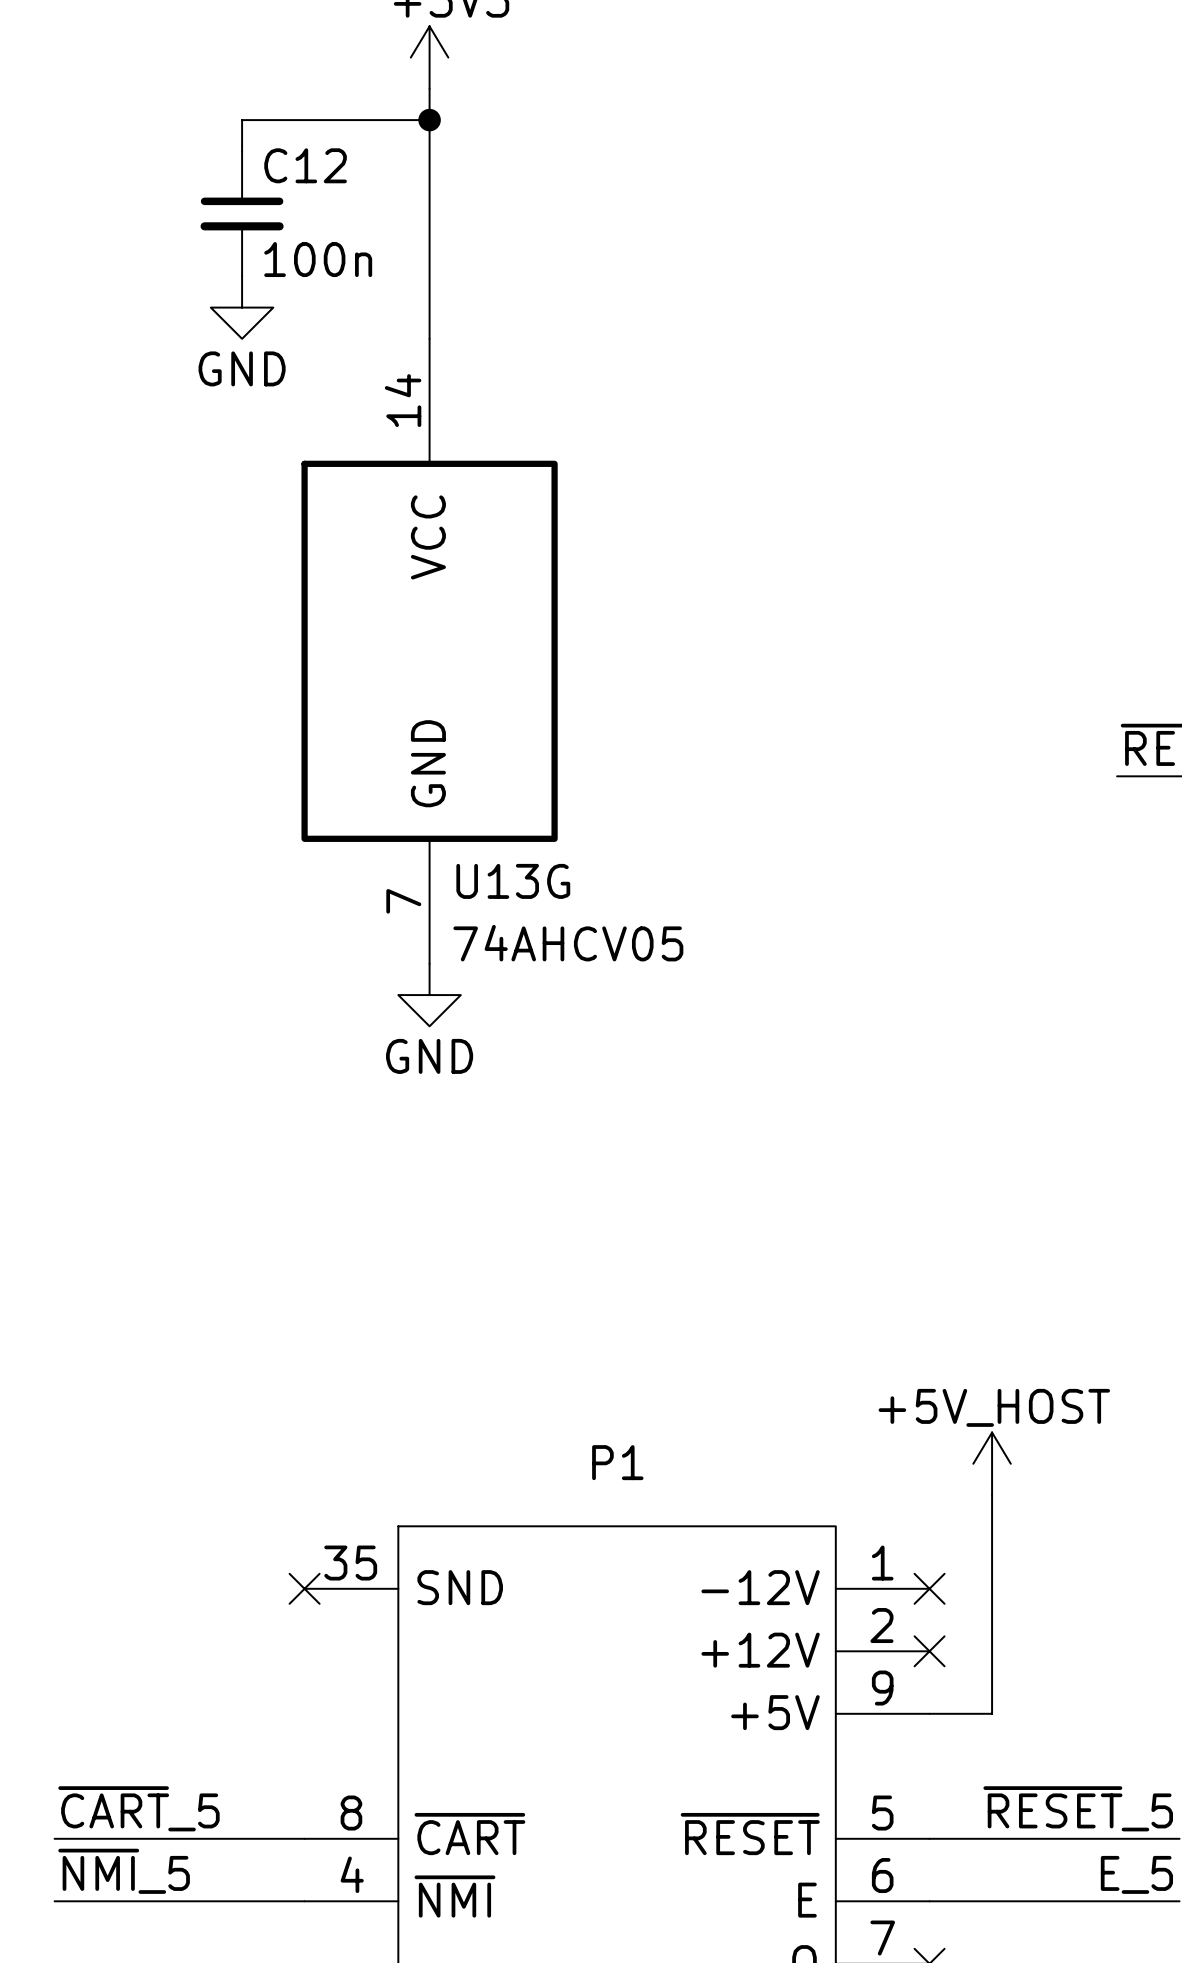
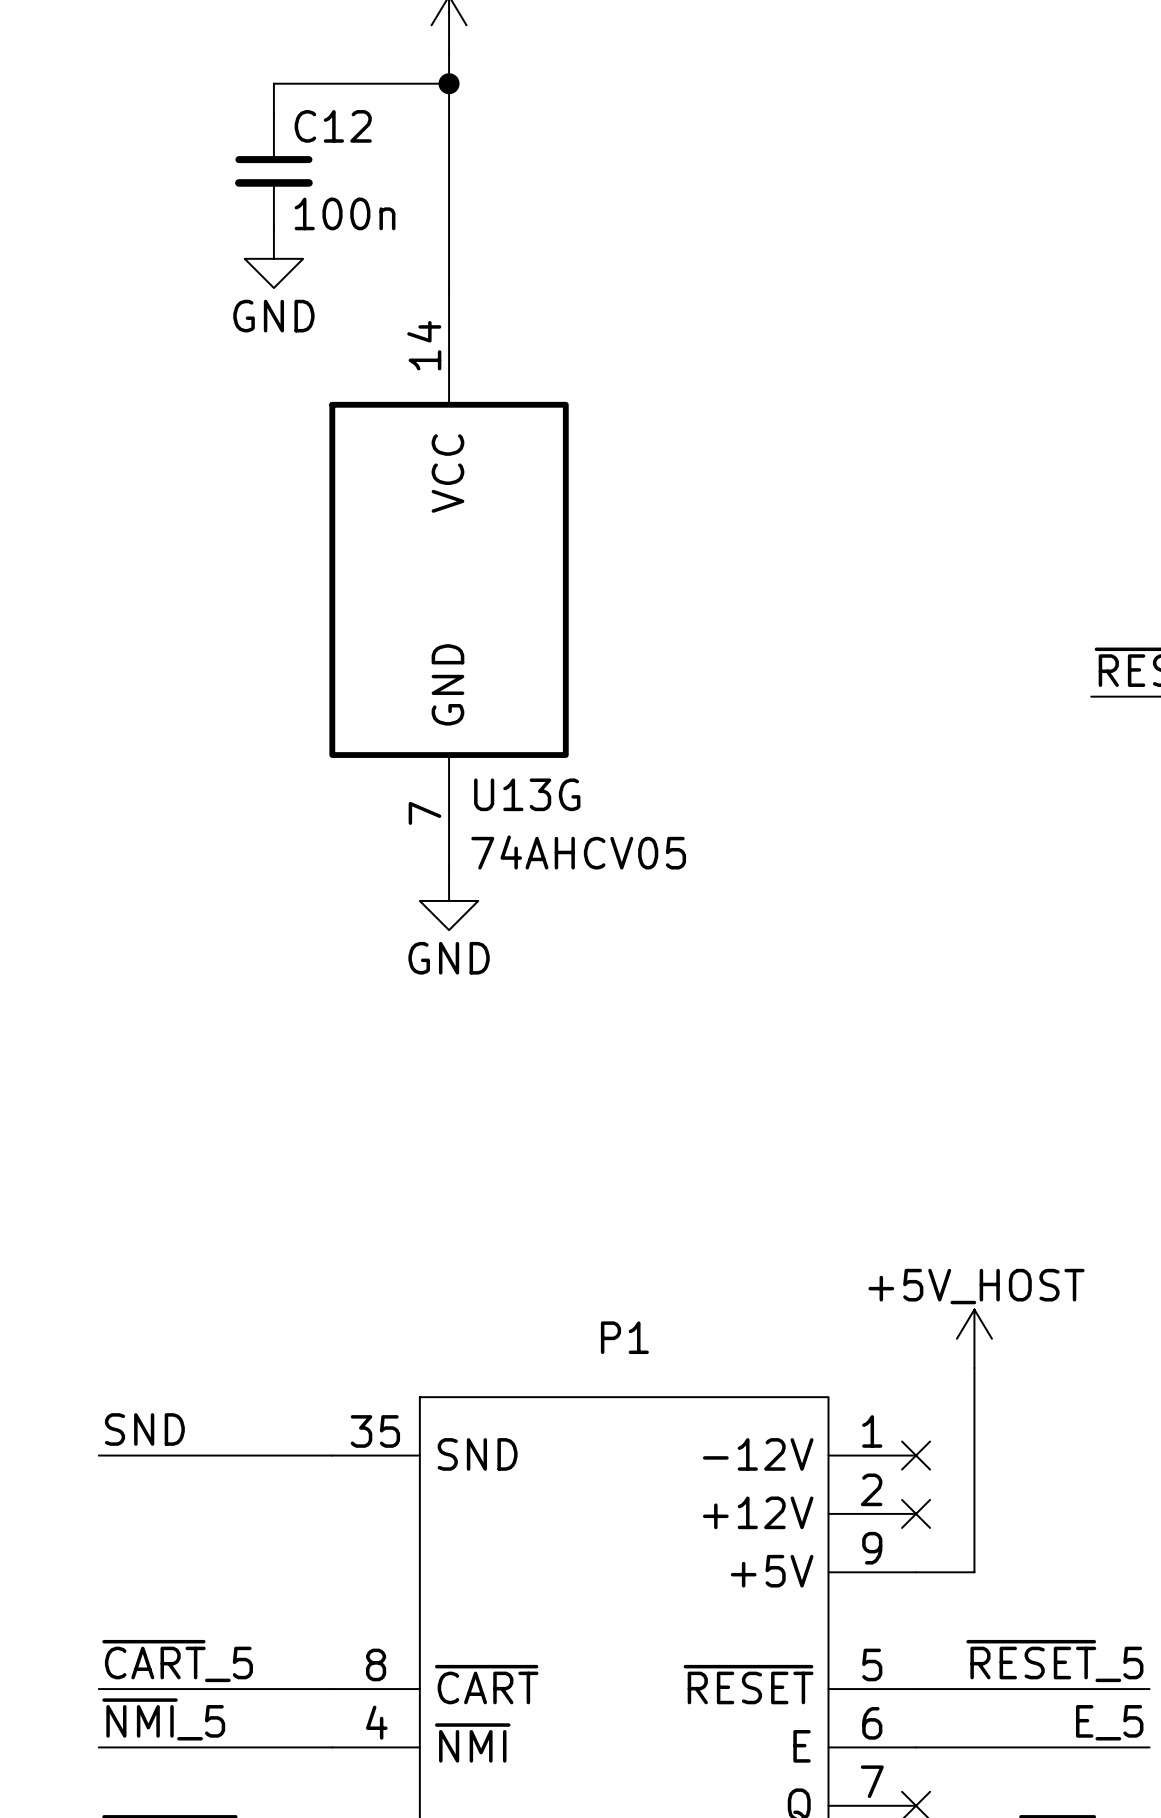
label: none -> SND (144, 1429)
wire: none -> (98, 1455) (332, 1455)
no-connect mark: (304, 1588) -> none

